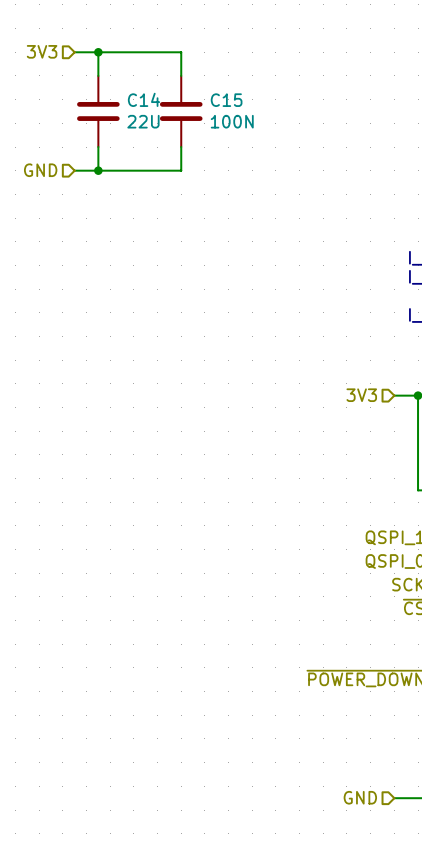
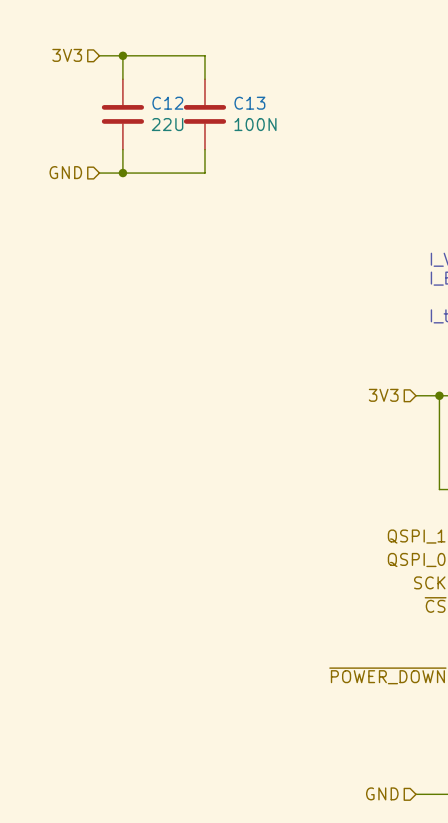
C14 name: C14 (144, 99) -> C12 (167, 103)
C15 name: C15 (226, 100) -> C13 (249, 103)

